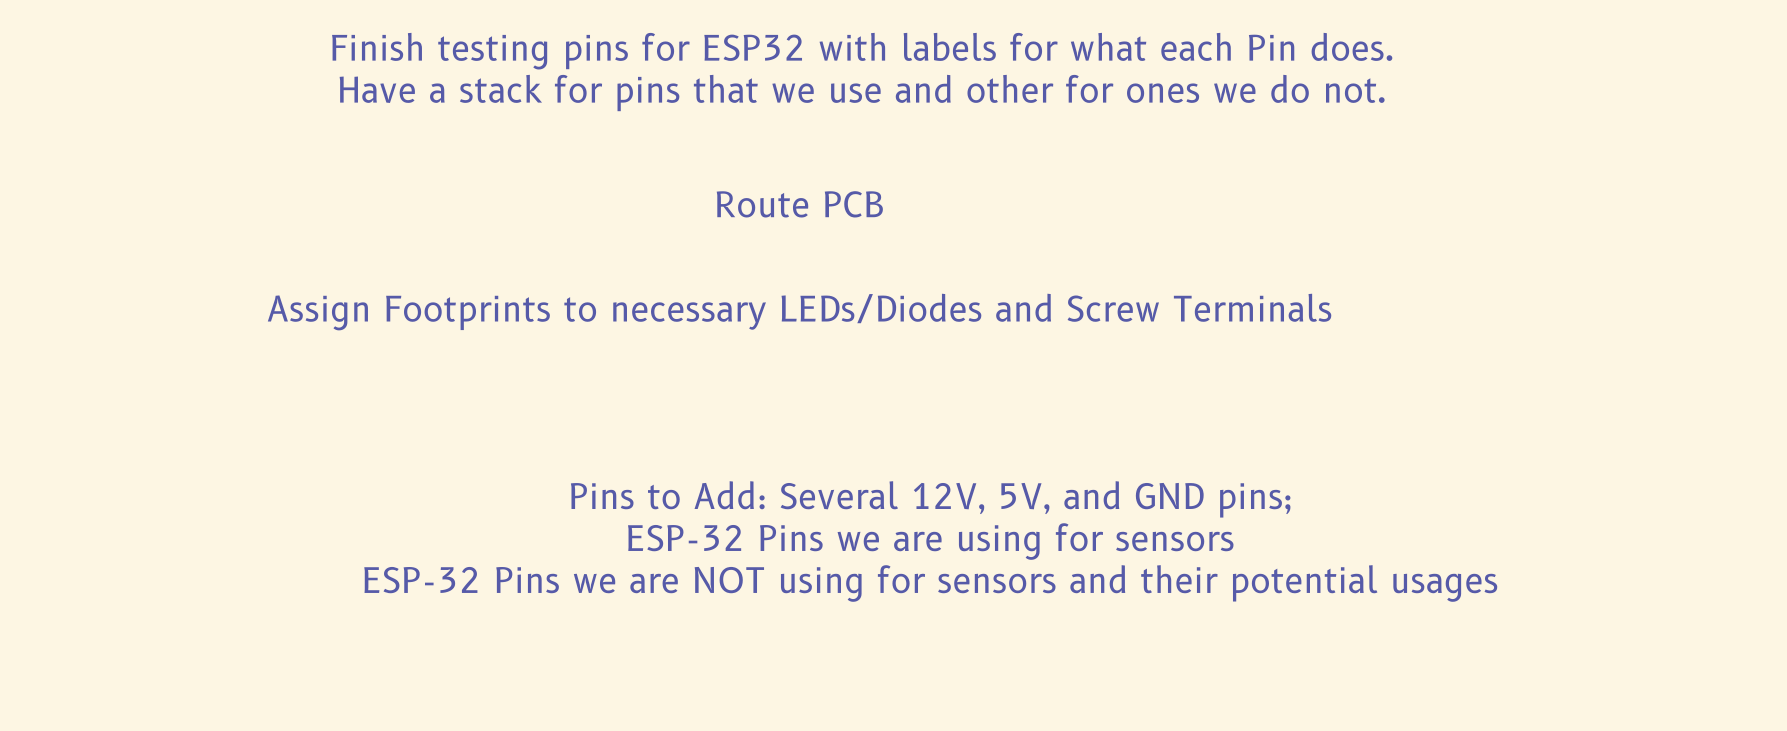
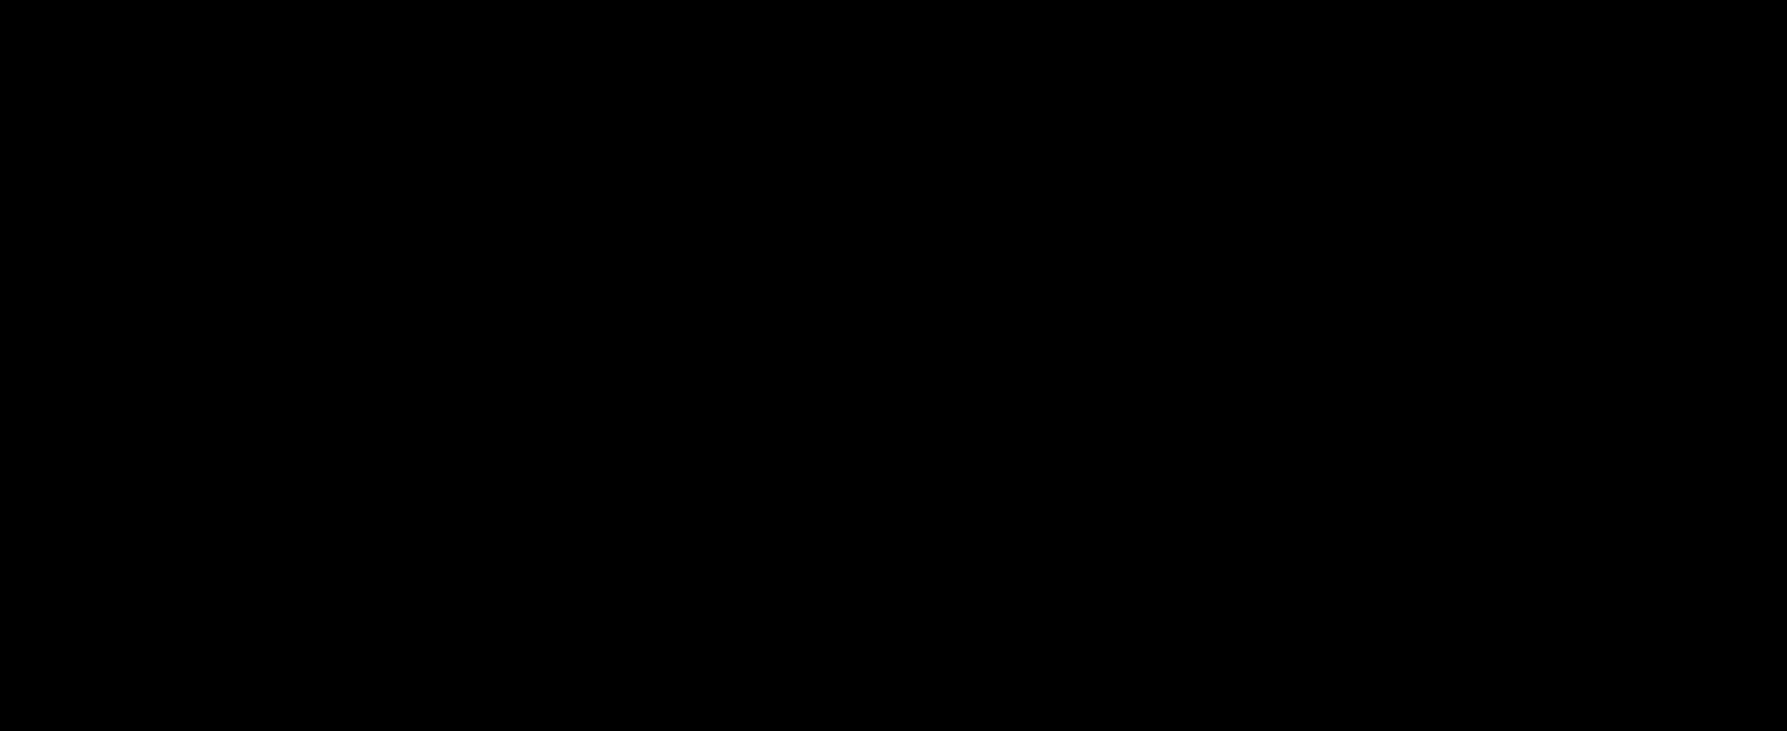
text: Finish testing pins for ESP32 with labels for what each Pin does. (862, 51) -> none
text: Have a stack for pins that we use and other for ones we do not. (862, 93) -> none
text: Route PCB (799, 204) -> none
text: Assign Footprints to necessary LEDs/Diodes and Screw Terminals (799, 312) -> none
text: Pins to Add: Several 12V, 5V, and GND pins; (930, 499) -> none
text: ESP-32 Pins we are using for sensors (930, 541) -> none
text: ESP-32 Pins we are NOT using for sensors and their potential usages (930, 583) -> none

